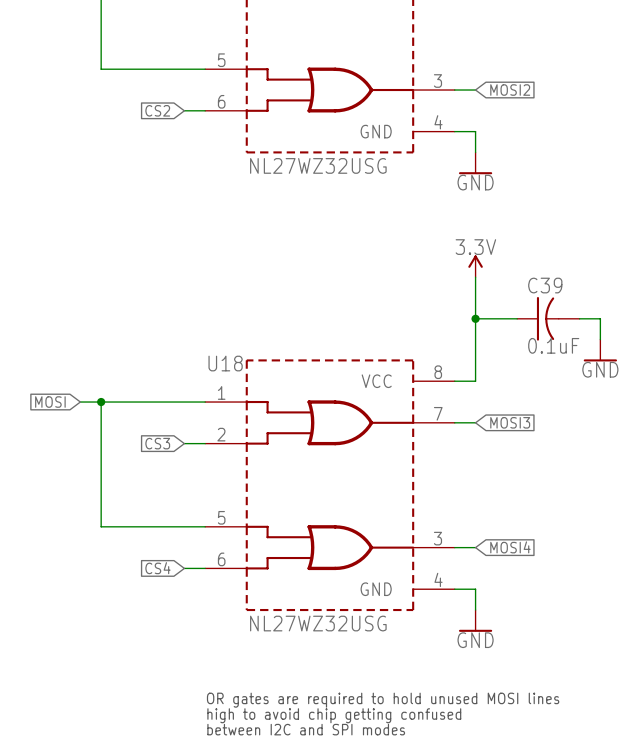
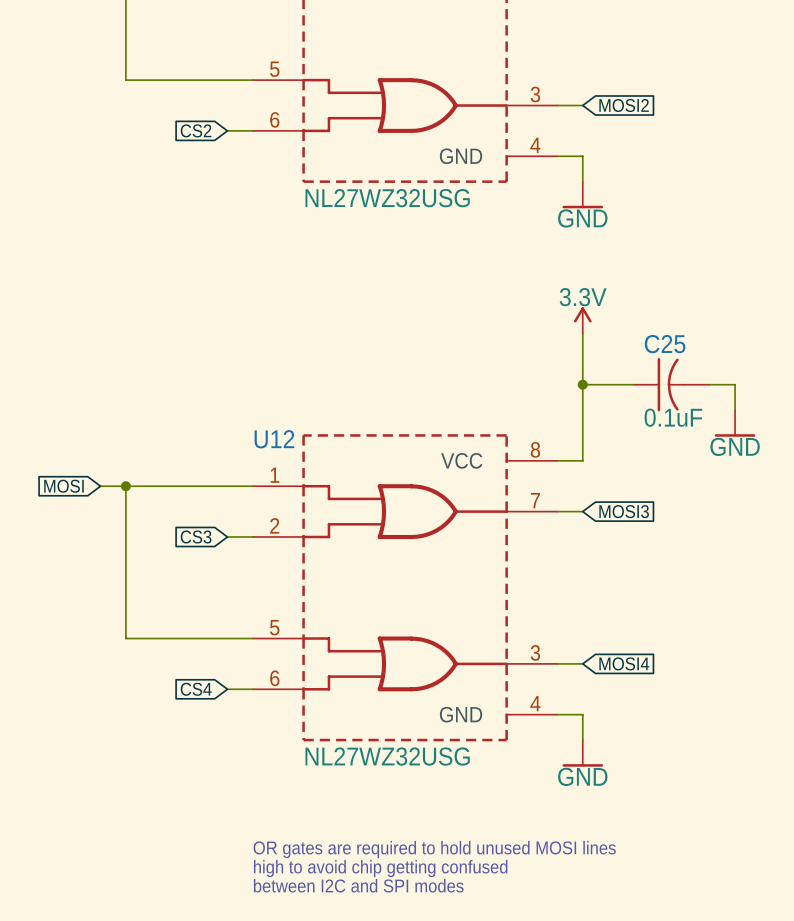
C39 name: C39 (545, 285) -> C25 (665, 344)
U18 name: U18 (225, 363) -> U12 (274, 439)

